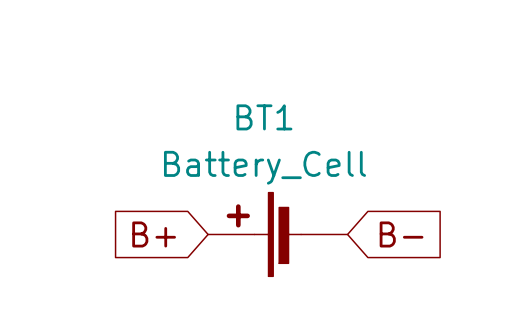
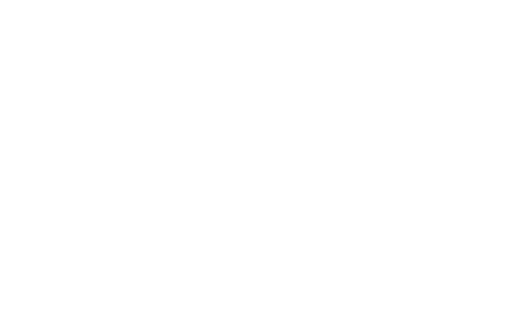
global label: B+ (154, 234) -> none
BT1: Battery_Cell (277, 234) -> none
global label: B- (401, 234) -> none

